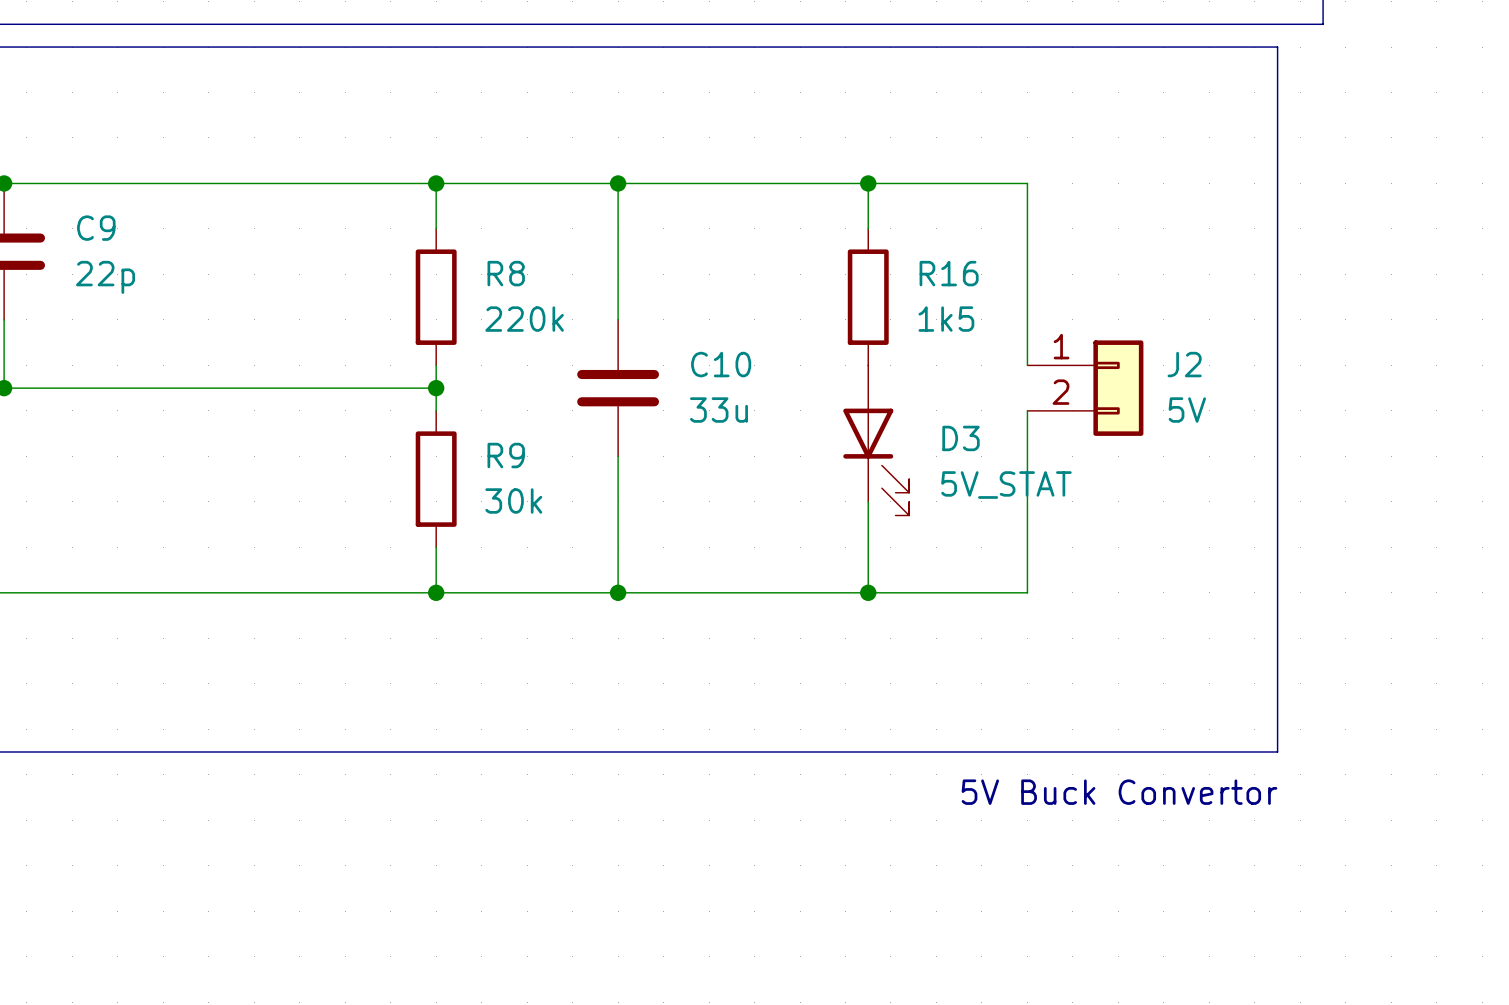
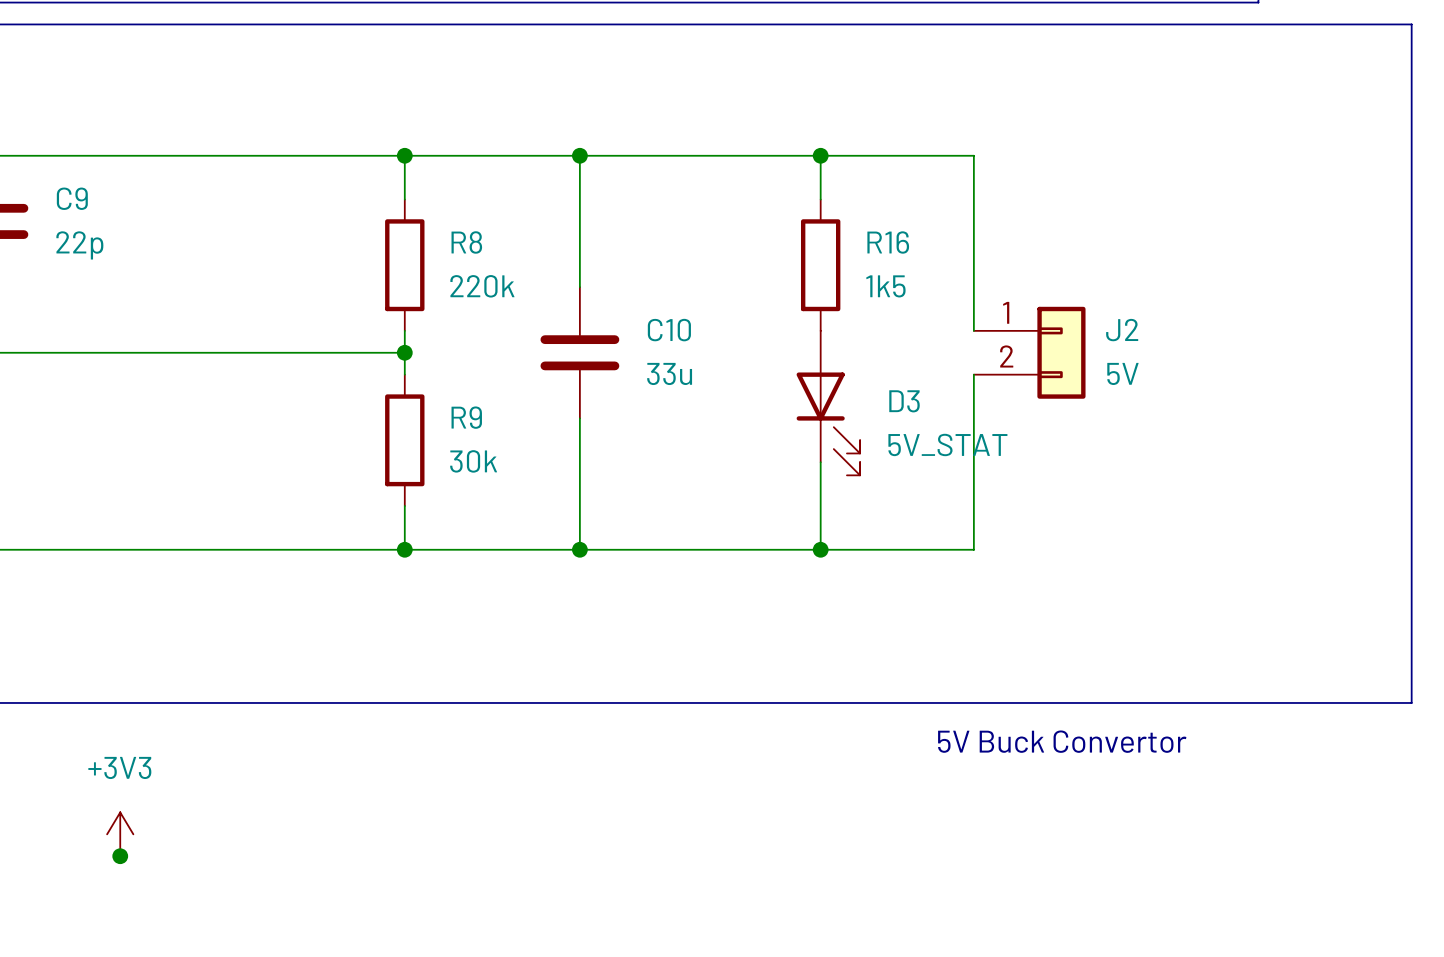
line: (1277, 47) (1277, 752) -> (1214, 24) (1411, 24) (1411, 702) (1214, 702)
power symbol: none -> +3V3 (120, 834)
junction: none -> (120, 856)

